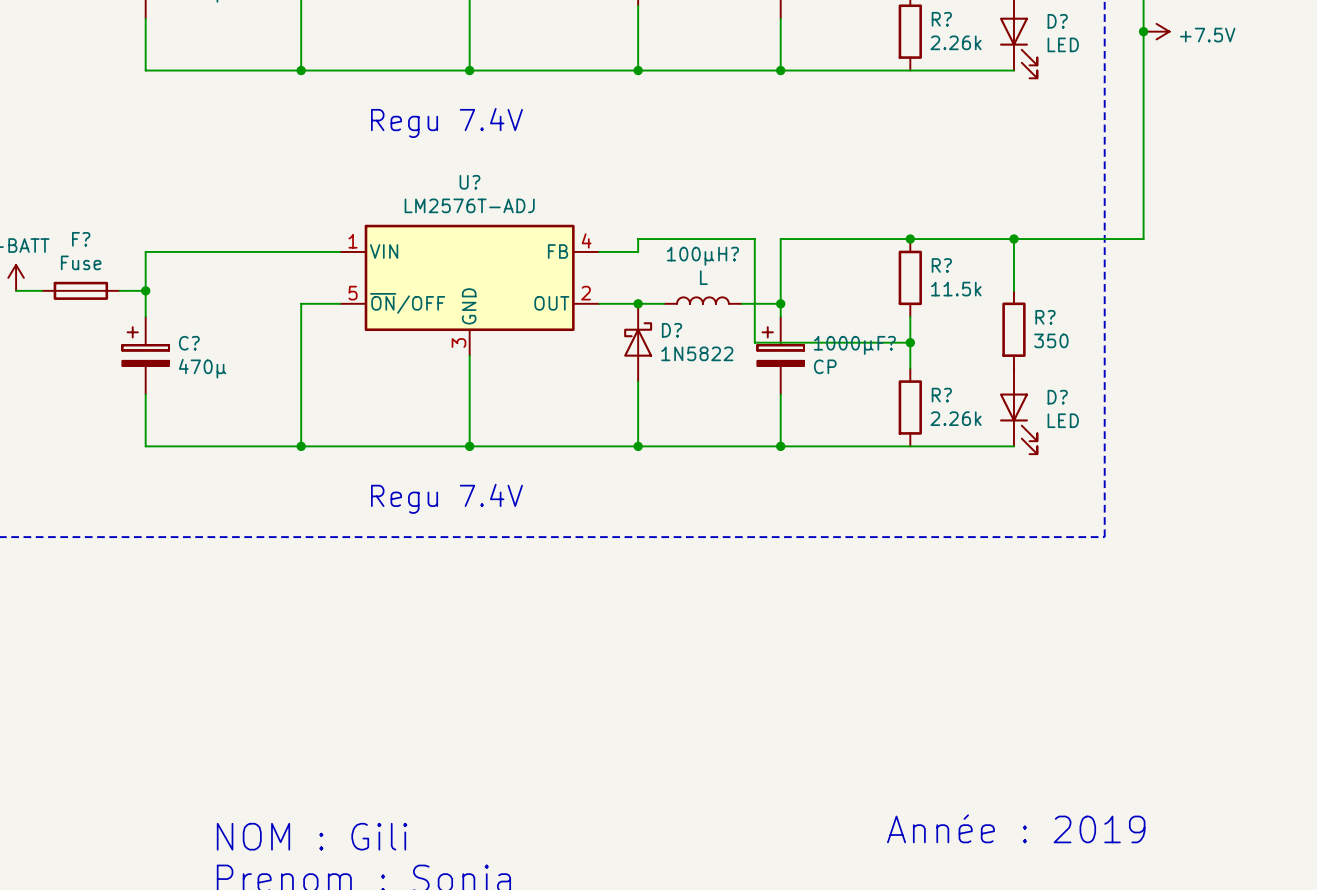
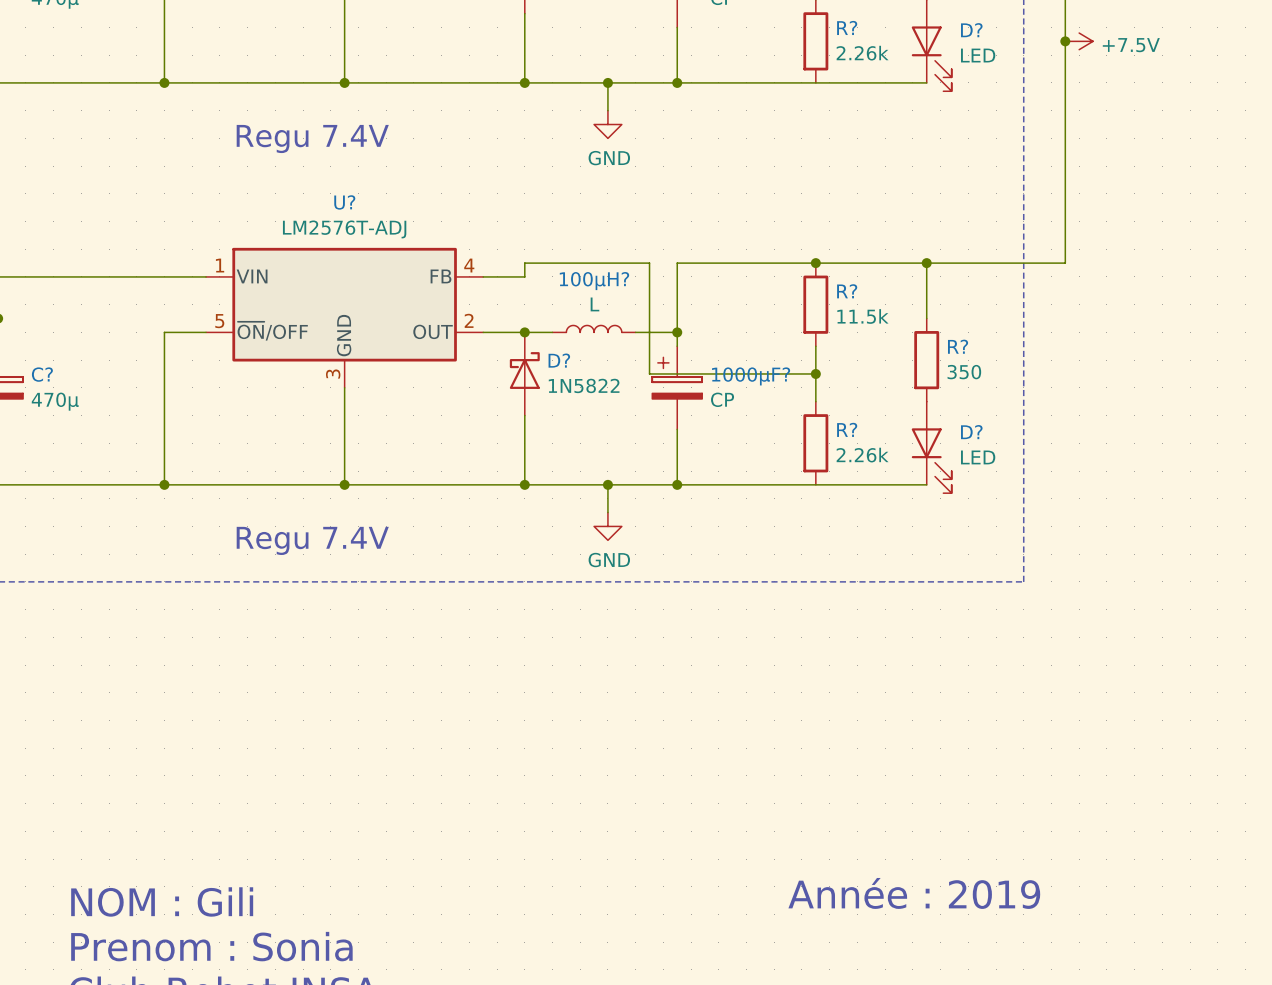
wire: none -> (607, 82) (607, 110)
junction: none -> (607, 82)
power symbol: none -> GND (607, 124)
wire: none -> (607, 484) (607, 512)
junction: none -> (607, 484)
power symbol: none -> GND (607, 526)

